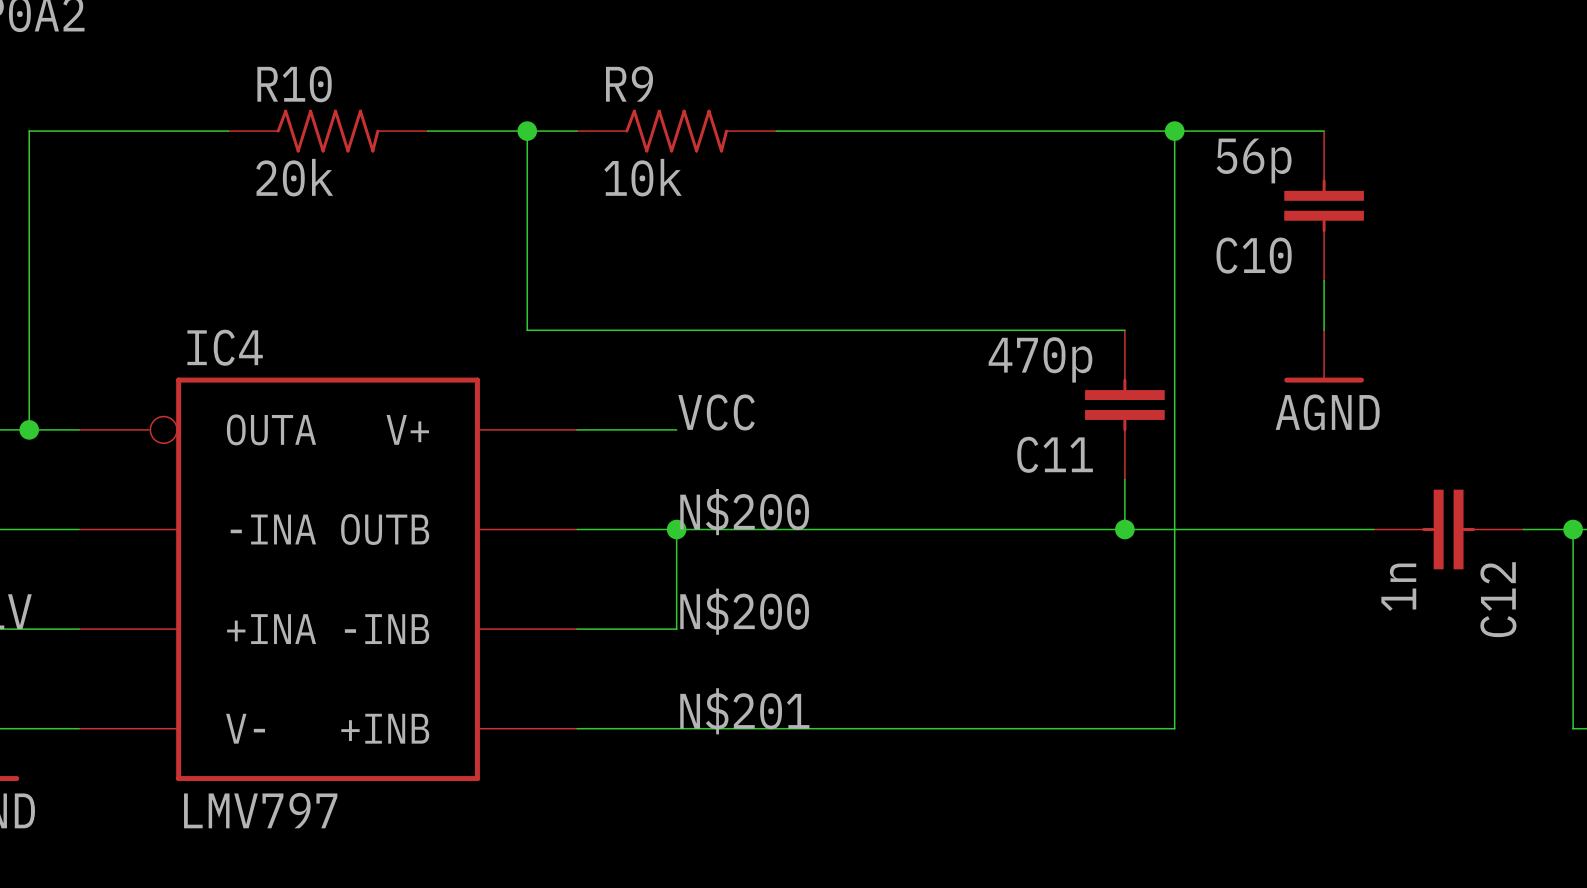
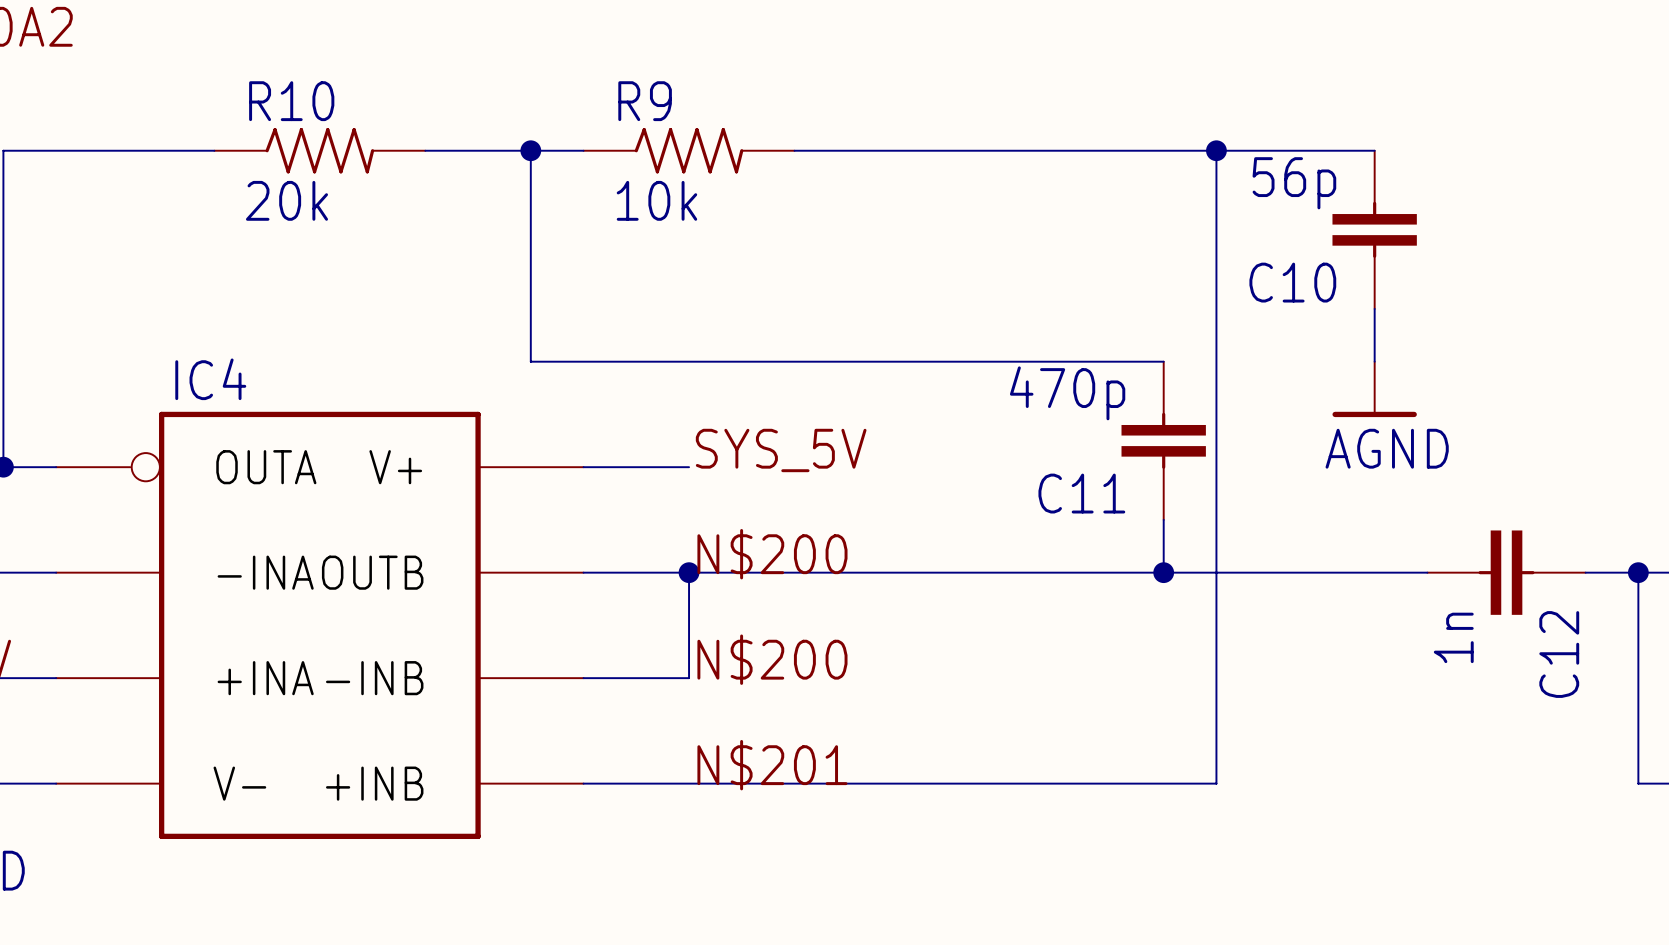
label: VCC (716, 412) -> SYS_5V (781, 450)
IC4 value: LMV797 (260, 810) -> none

